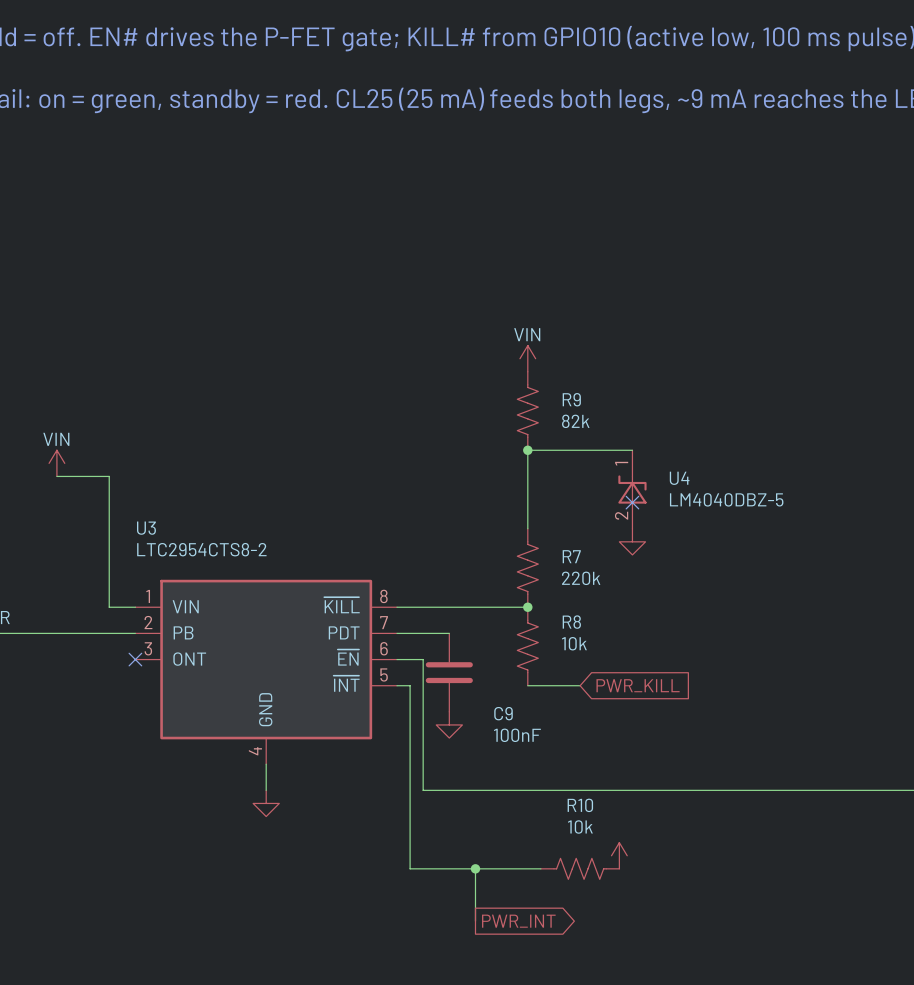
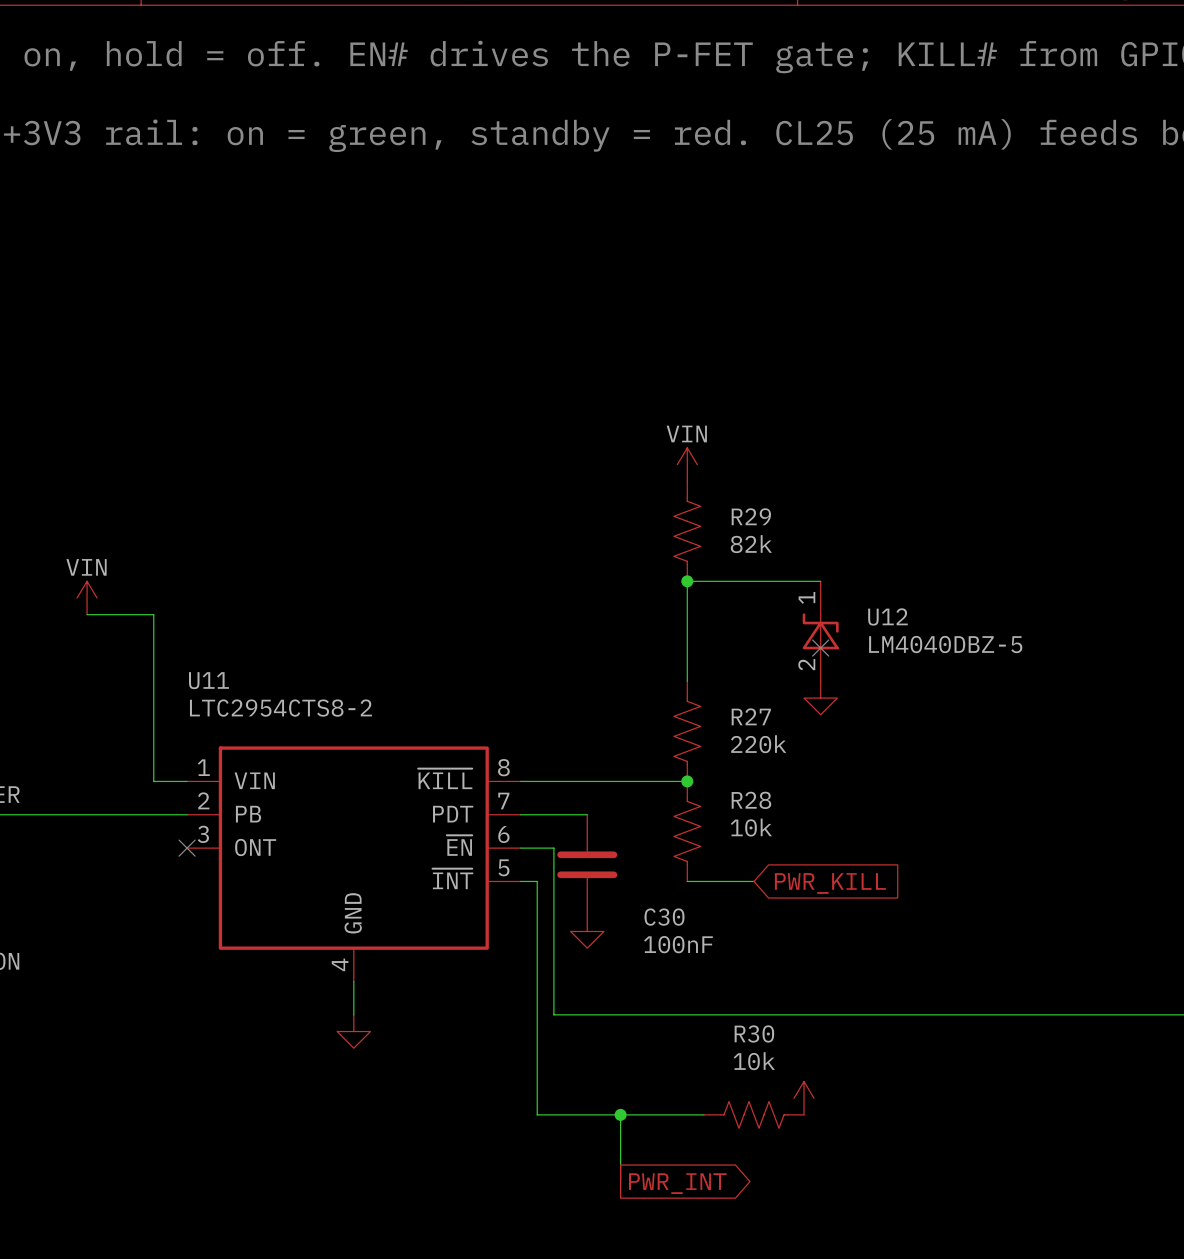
R9 name: R9 (571, 399) -> R29 (751, 516)
U4 name: U4 (679, 478) -> U12 (887, 616)
U3 name: U3 (146, 528) -> U11 (208, 680)
R7 name: R7 (571, 556) -> R27 (751, 716)
R8 name: R8 (571, 622) -> R28 (751, 800)
C9 name: C9 (503, 713) -> C30 (664, 917)
R10 name: R10 (580, 805) -> R30 (754, 1033)

